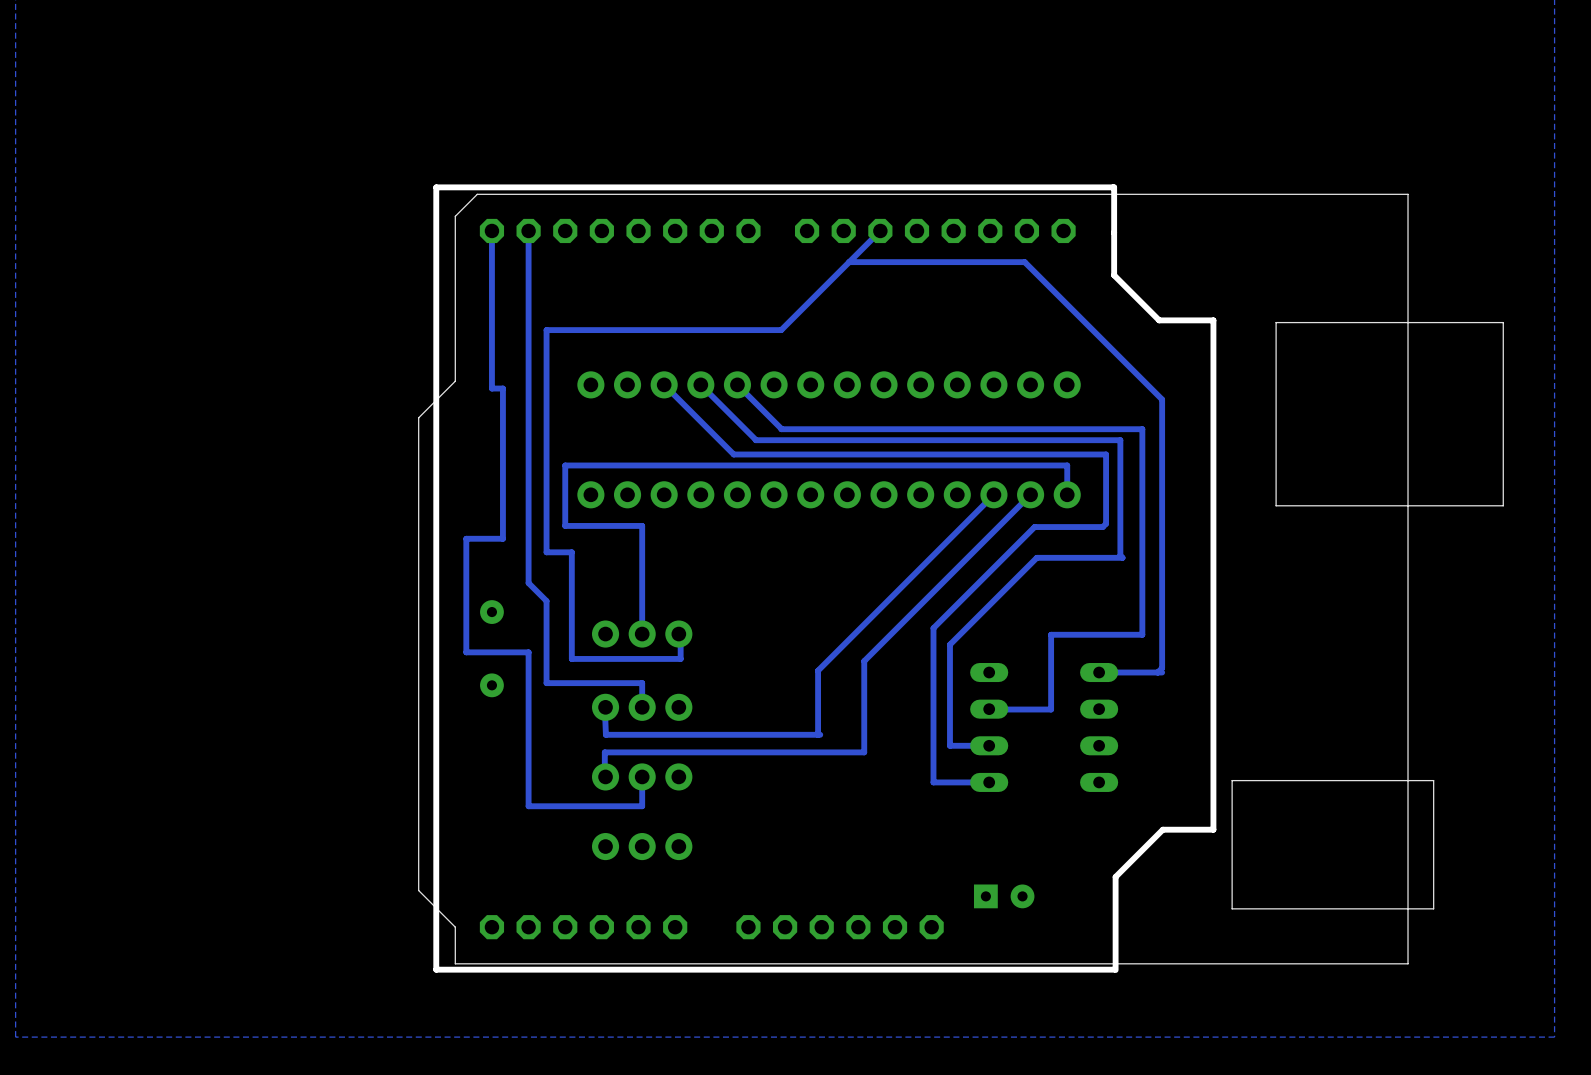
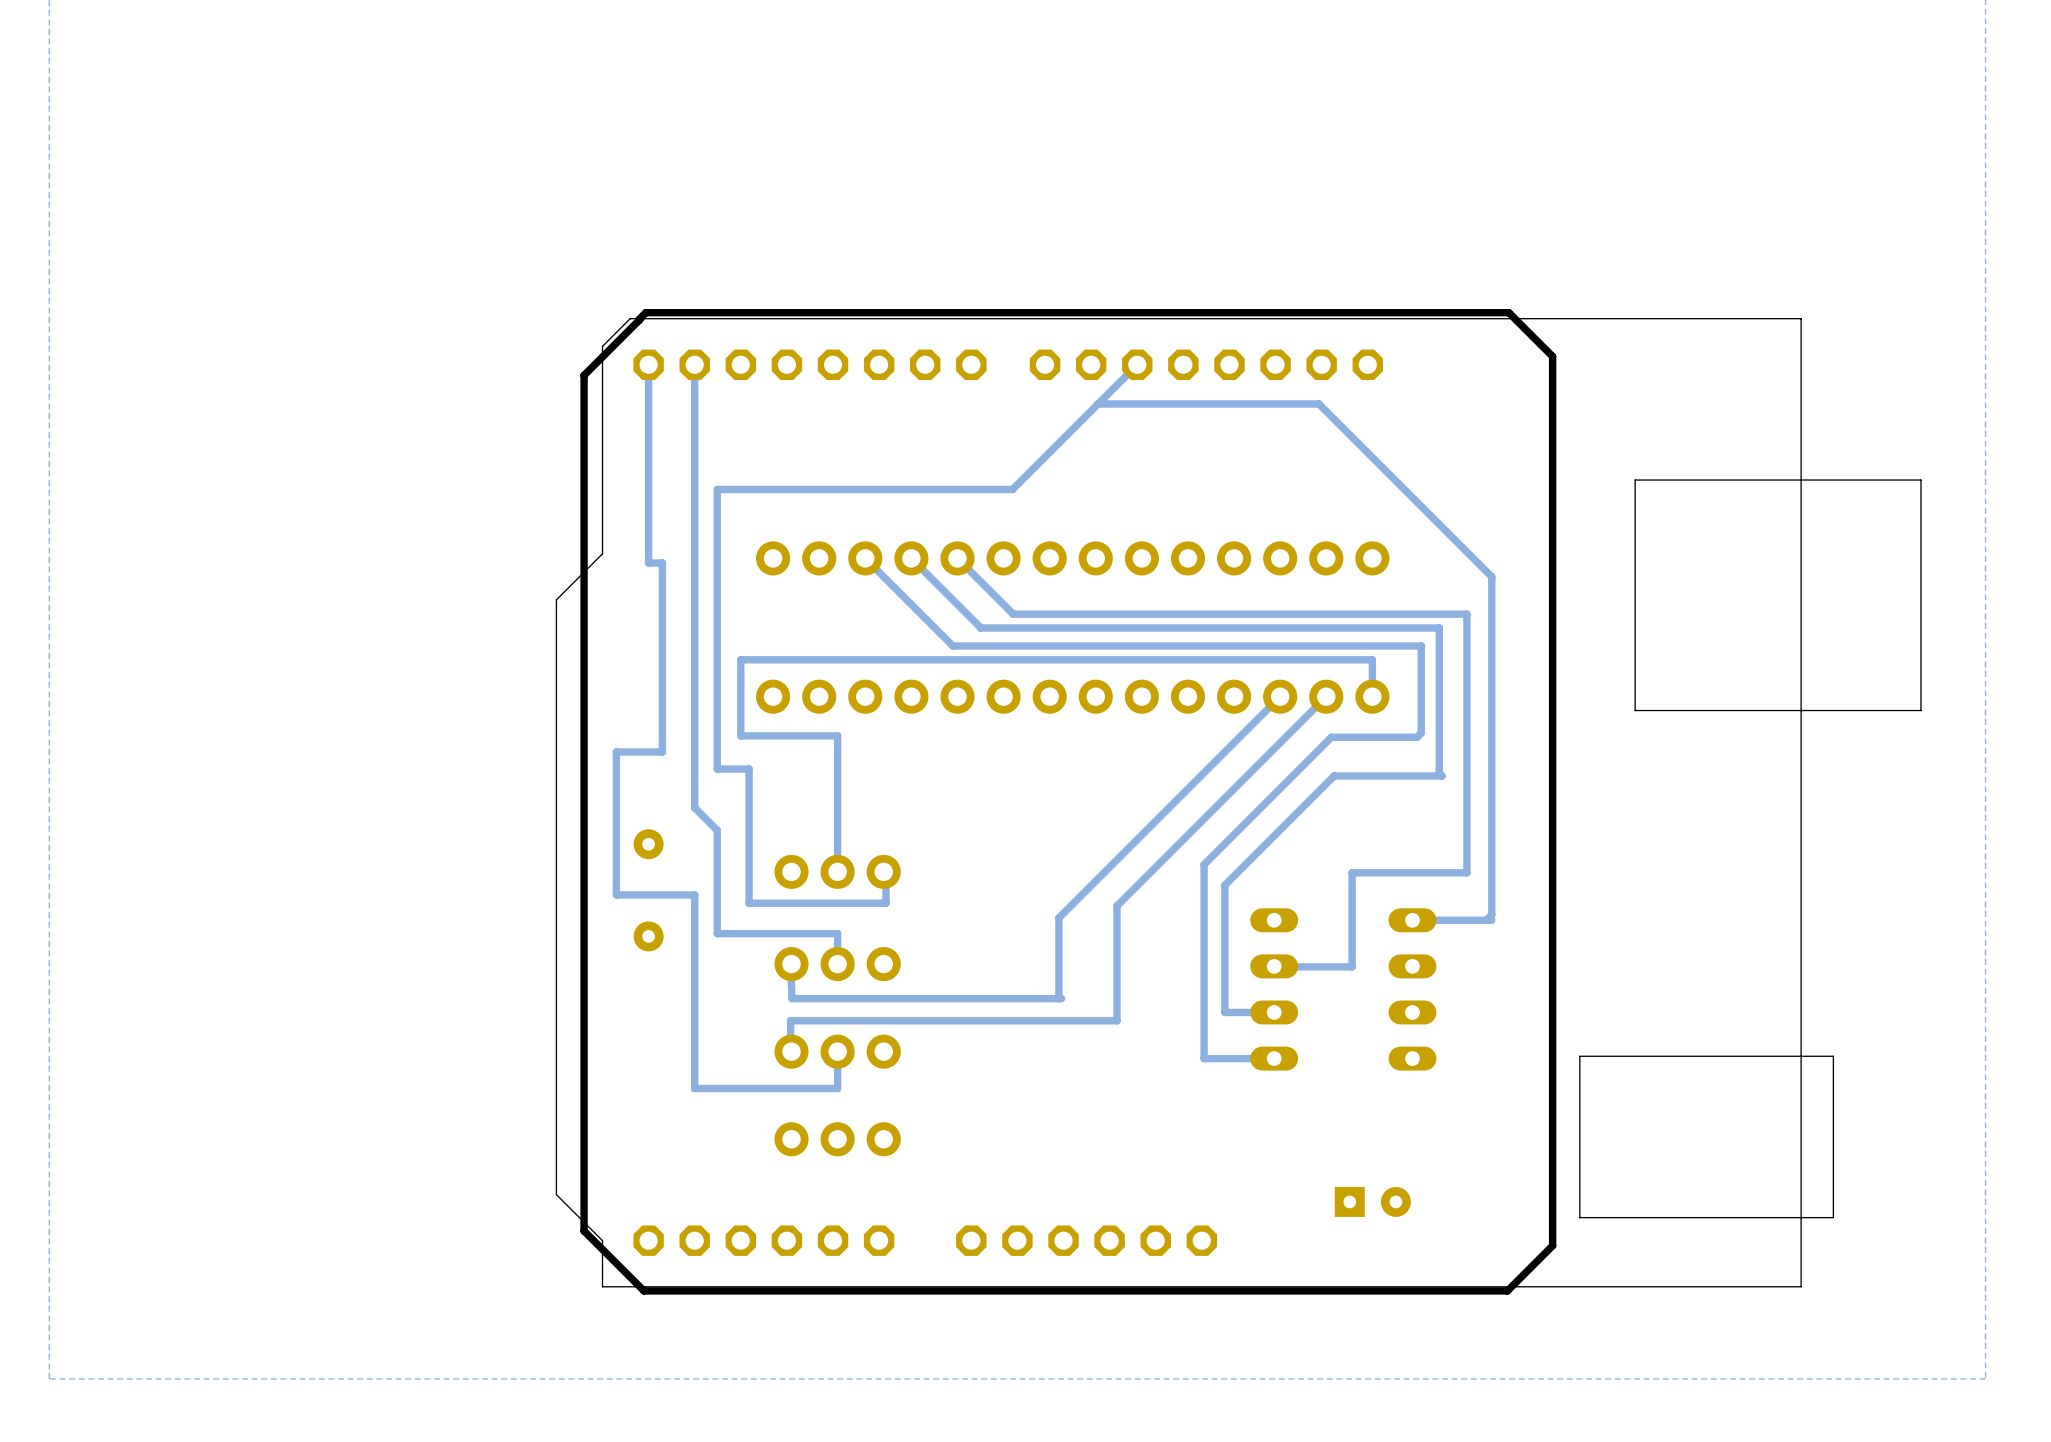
board edge: (1112, 187) (436, 187) (436, 969) (1113, 969) -> none
board edge: (1113, 187) (1114, 275) (1159, 320) (1213, 320) (1213, 829) (1162, 829) (1115, 876) (1115, 970) -> none
board edge: none -> (640, 318) (584, 375) (584, 1231) (644, 1290) (1507, 1290) (1552, 1245) (1552, 356) (1508, 312) (645, 312) (638, 319) (638, 320)
part position: (1004, 896) -> (1372, 1201)

